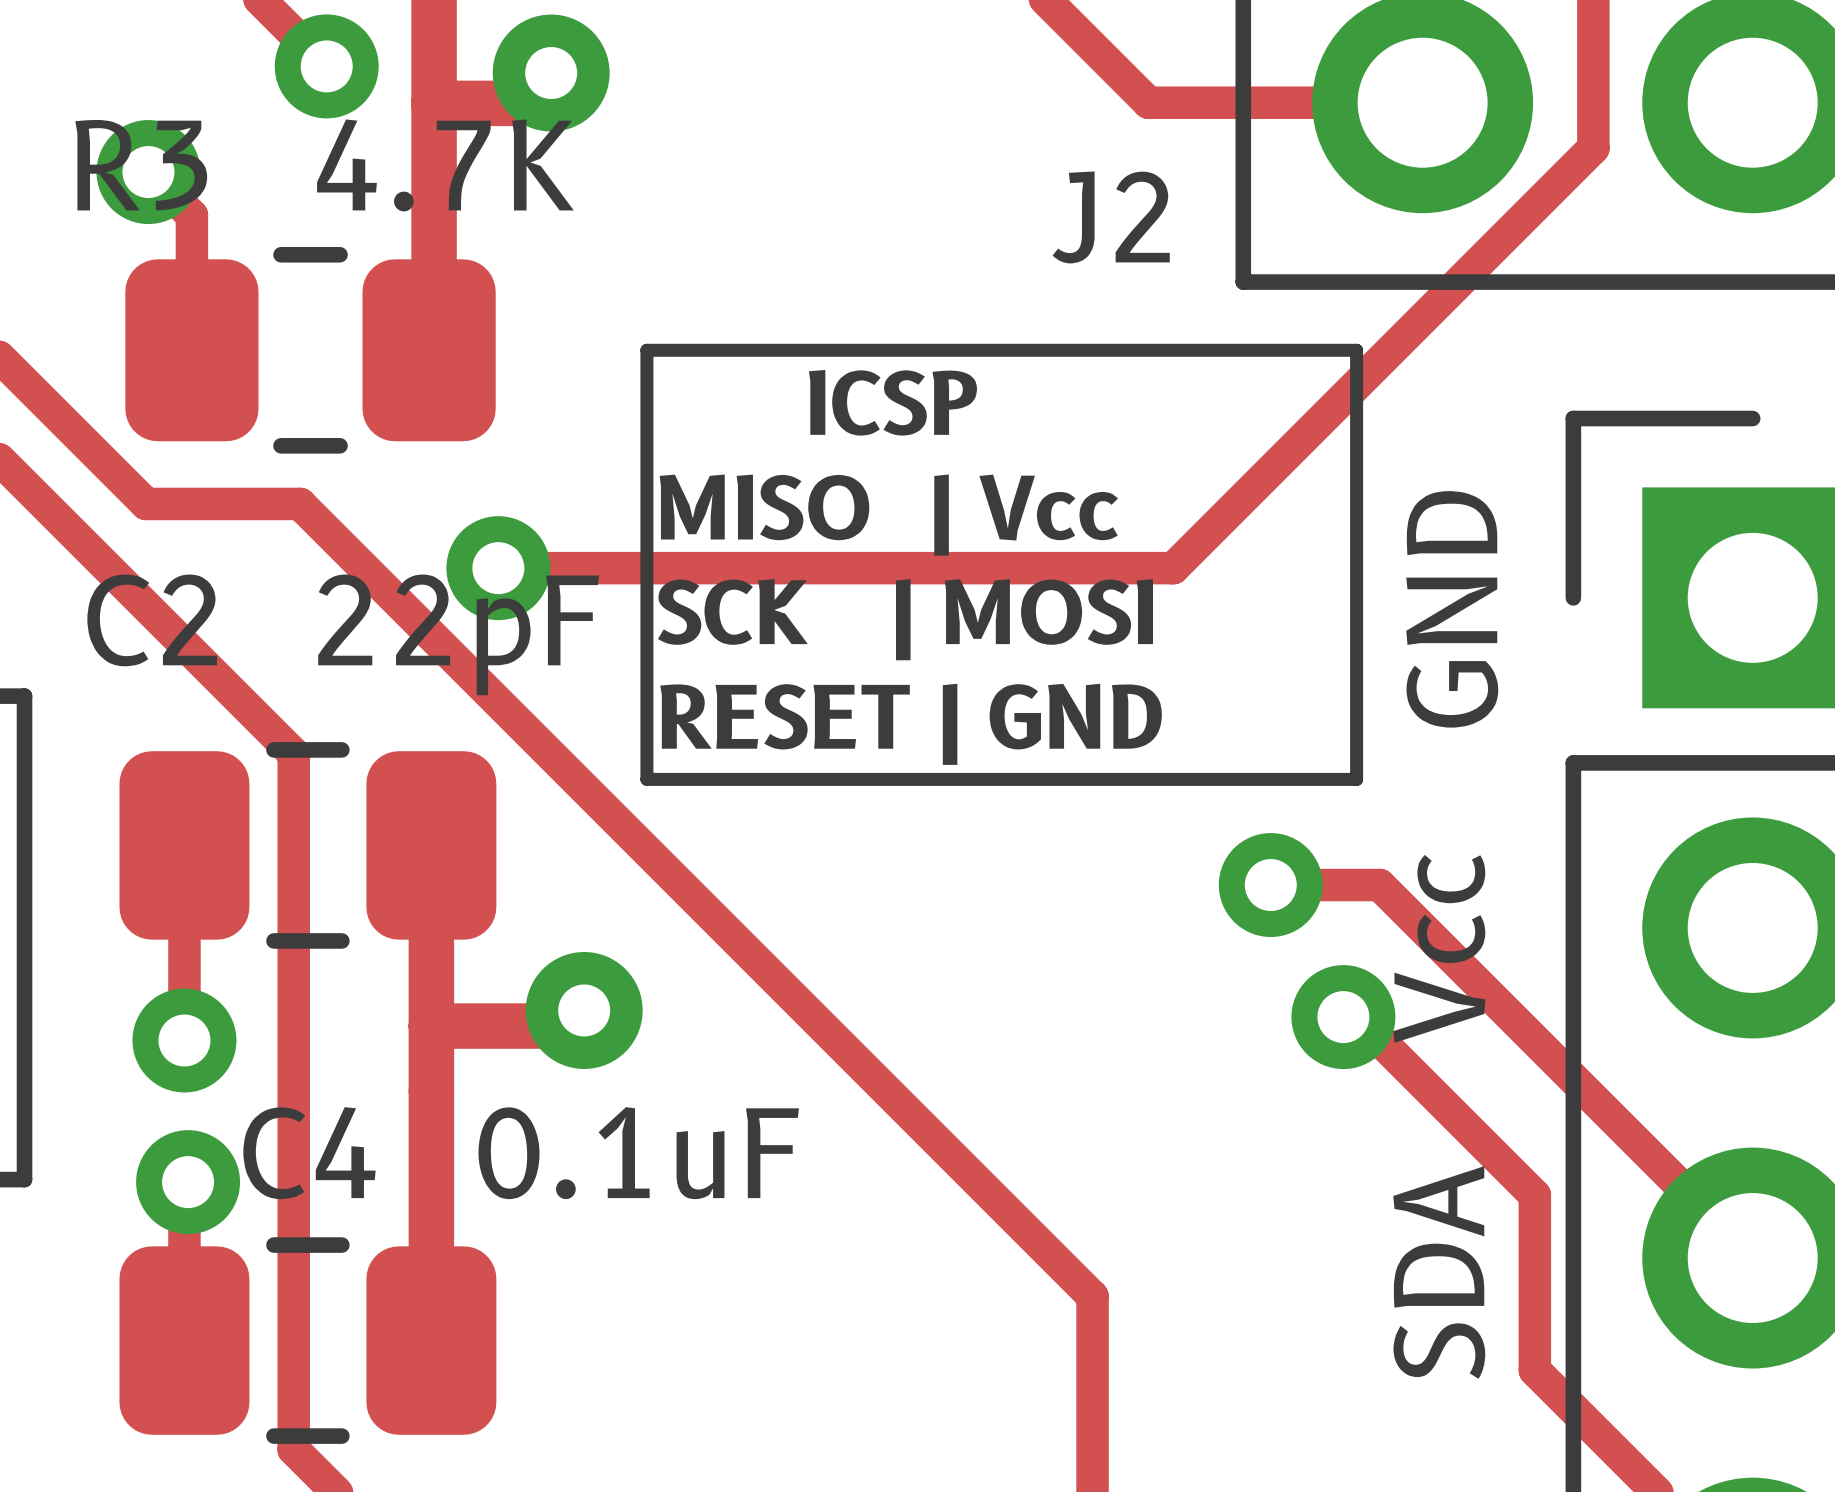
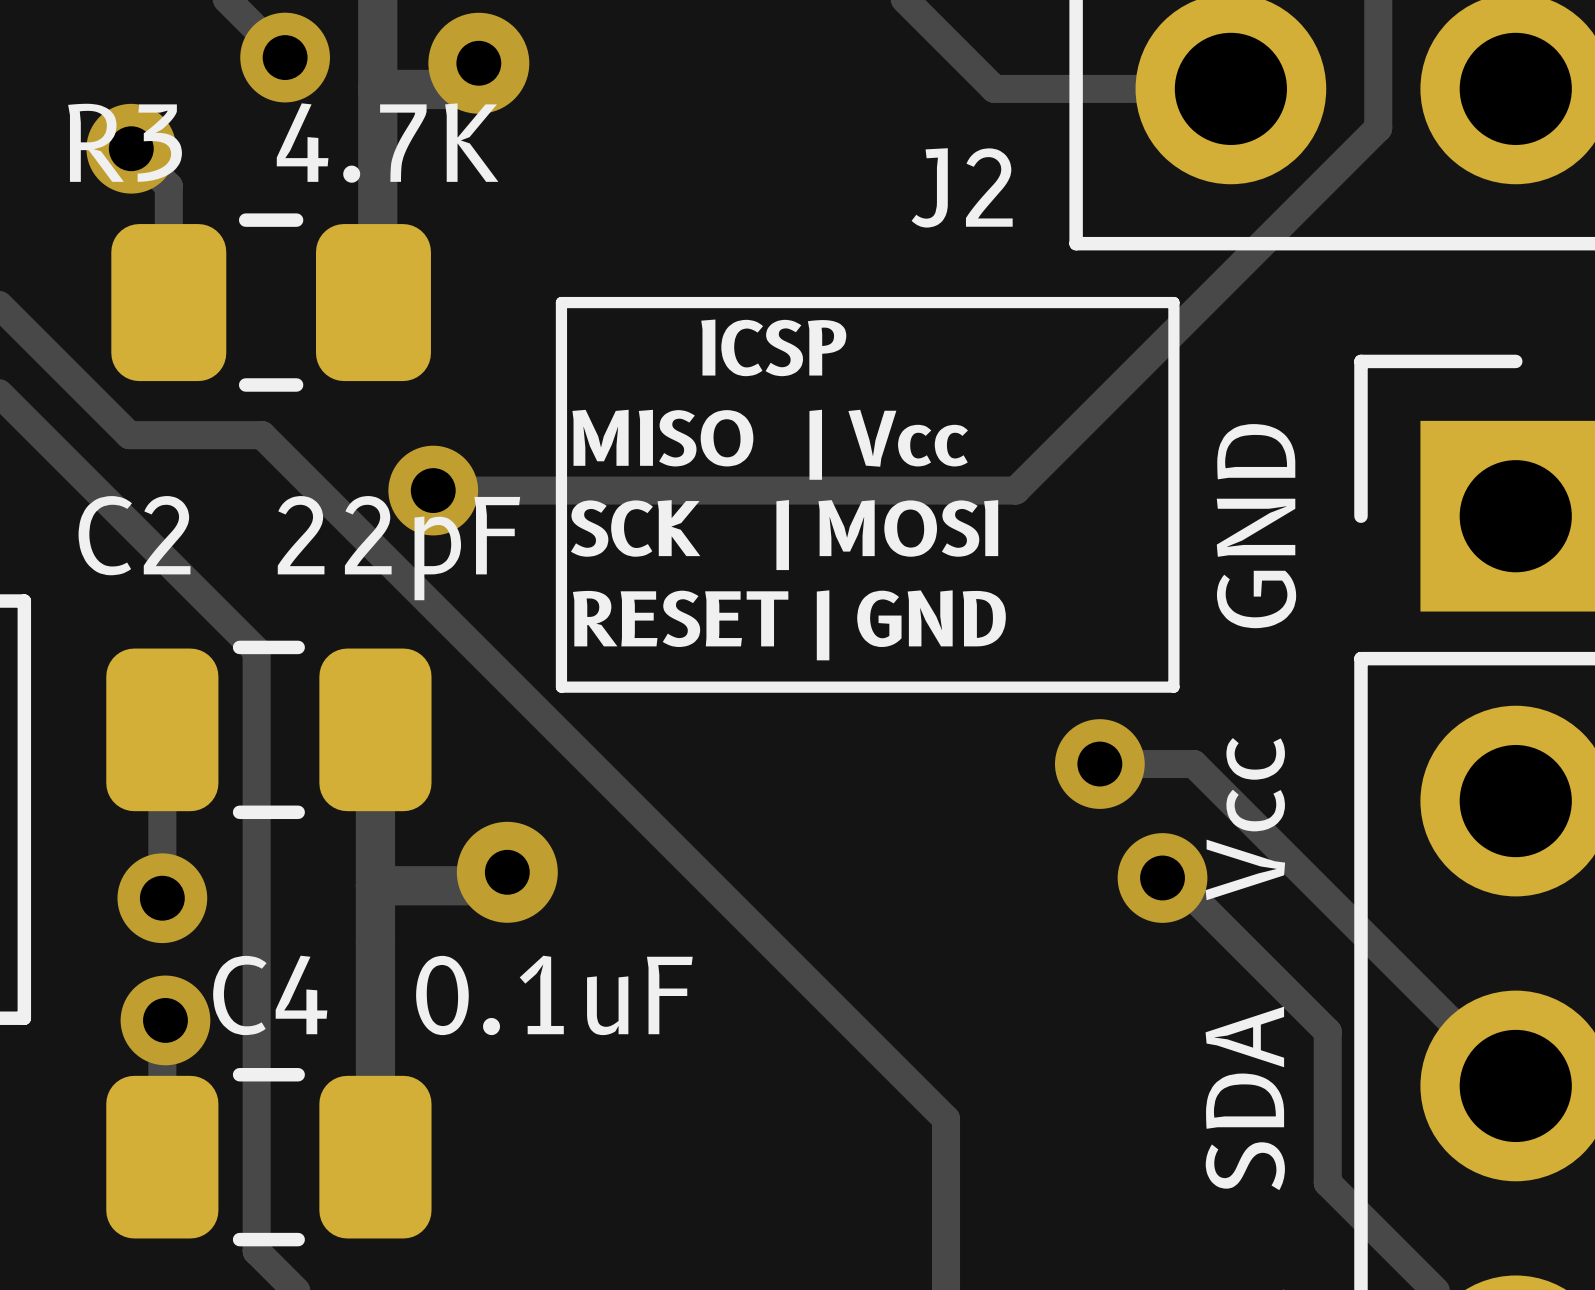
line: (646, 779) (1356, 779) -> (561, 672) (561, 687) (1173, 687) (1173, 672)

